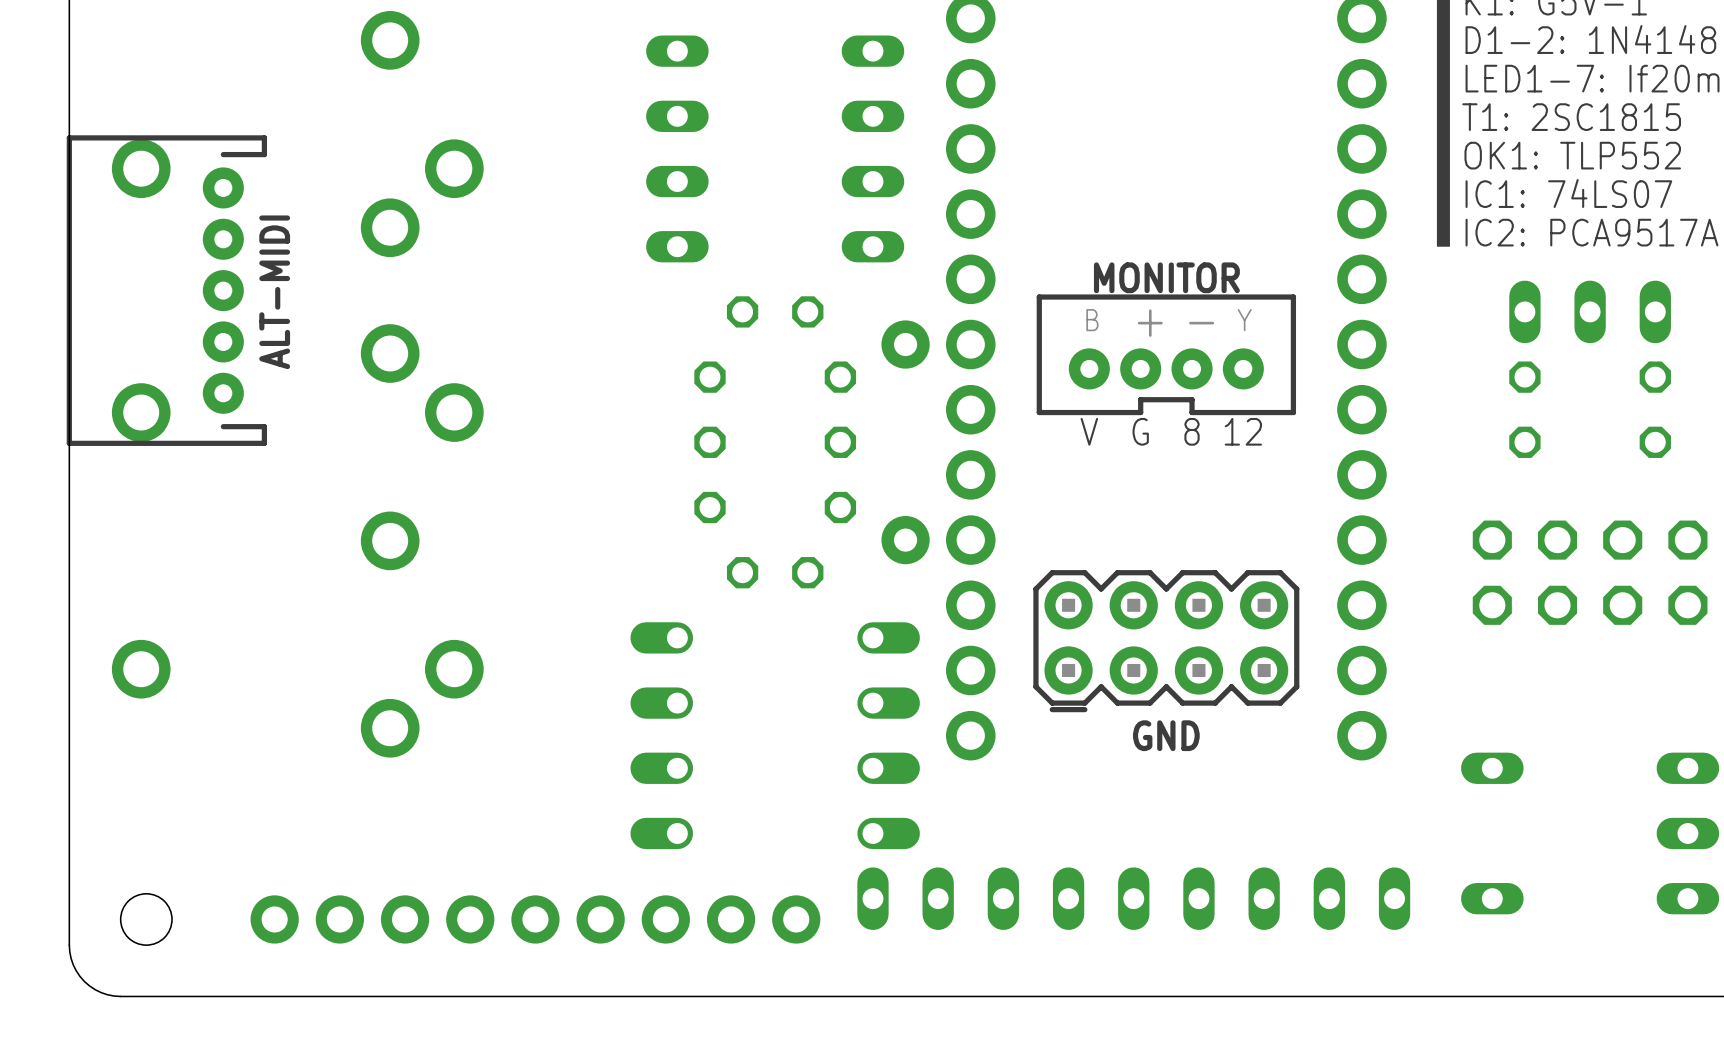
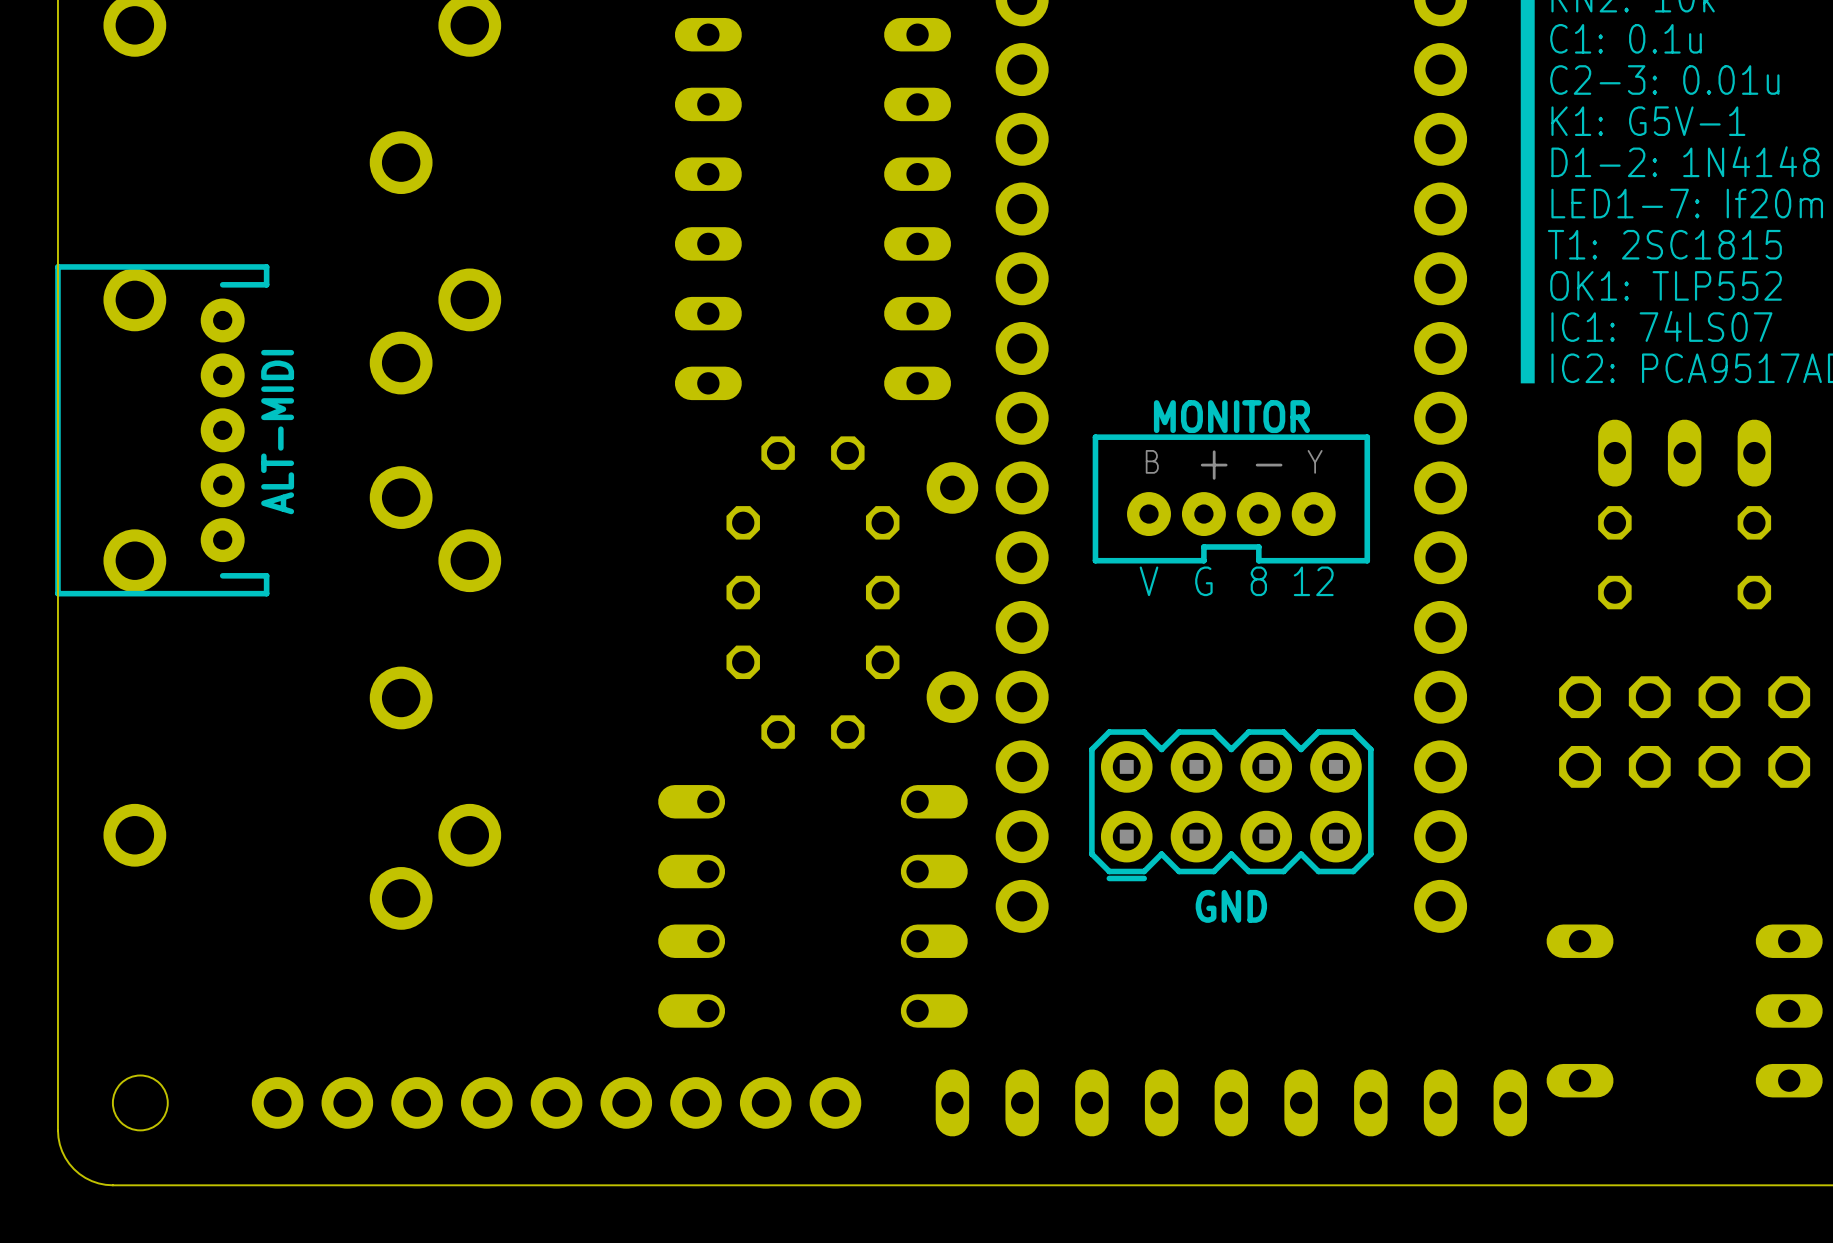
part position: (1133, 898) -> (1231, 1102)

